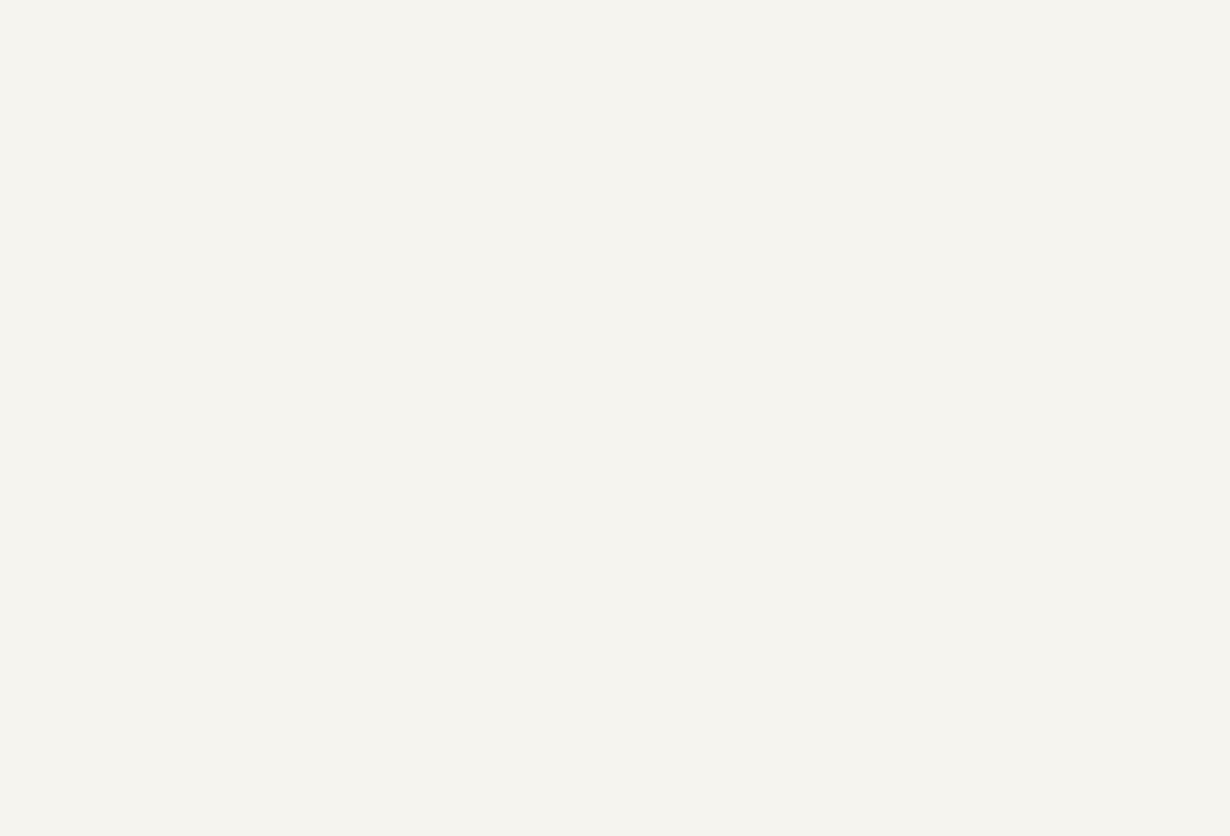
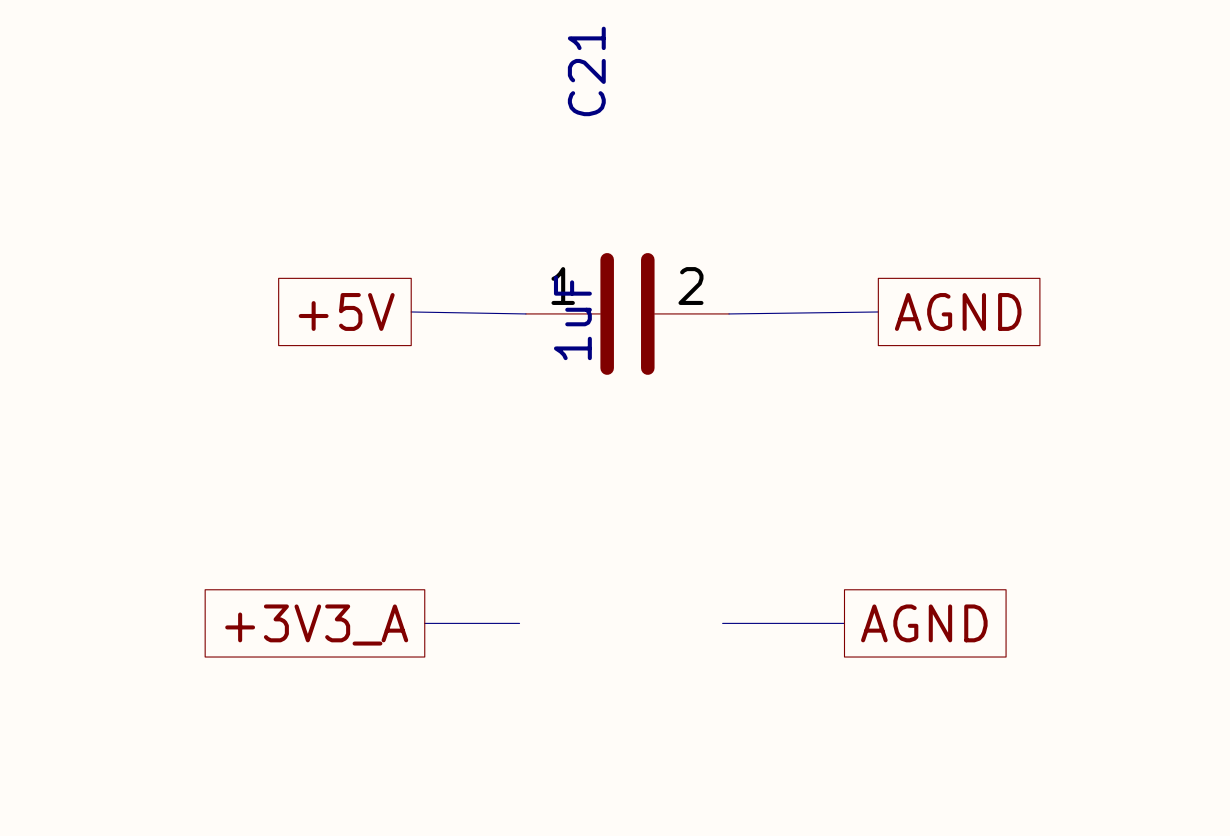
global label: none -> +5V (346, 311)
wire: none -> (411, 311) (525, 313)
wire: none -> (878, 311) (729, 313)
global label: none -> AGND (958, 311)
C21: none -> 1uF (627, 313)
wire: none -> (424, 623) (519, 623)
wire: none -> (722, 623) (844, 623)
global label: none -> AGND (924, 623)
global label: none -> +3V3_A (316, 625)

